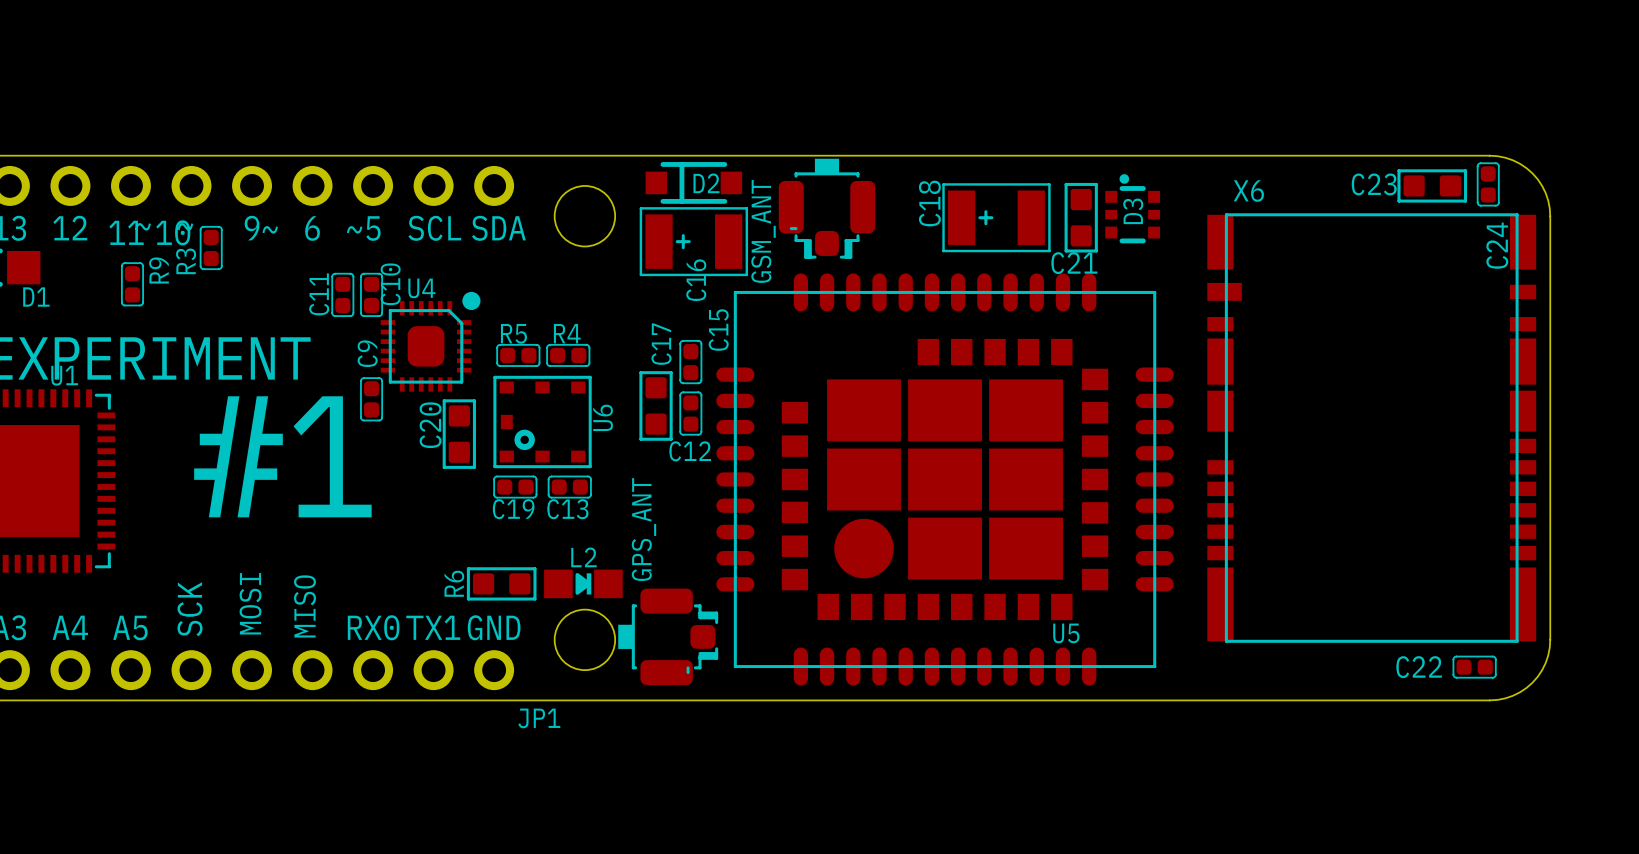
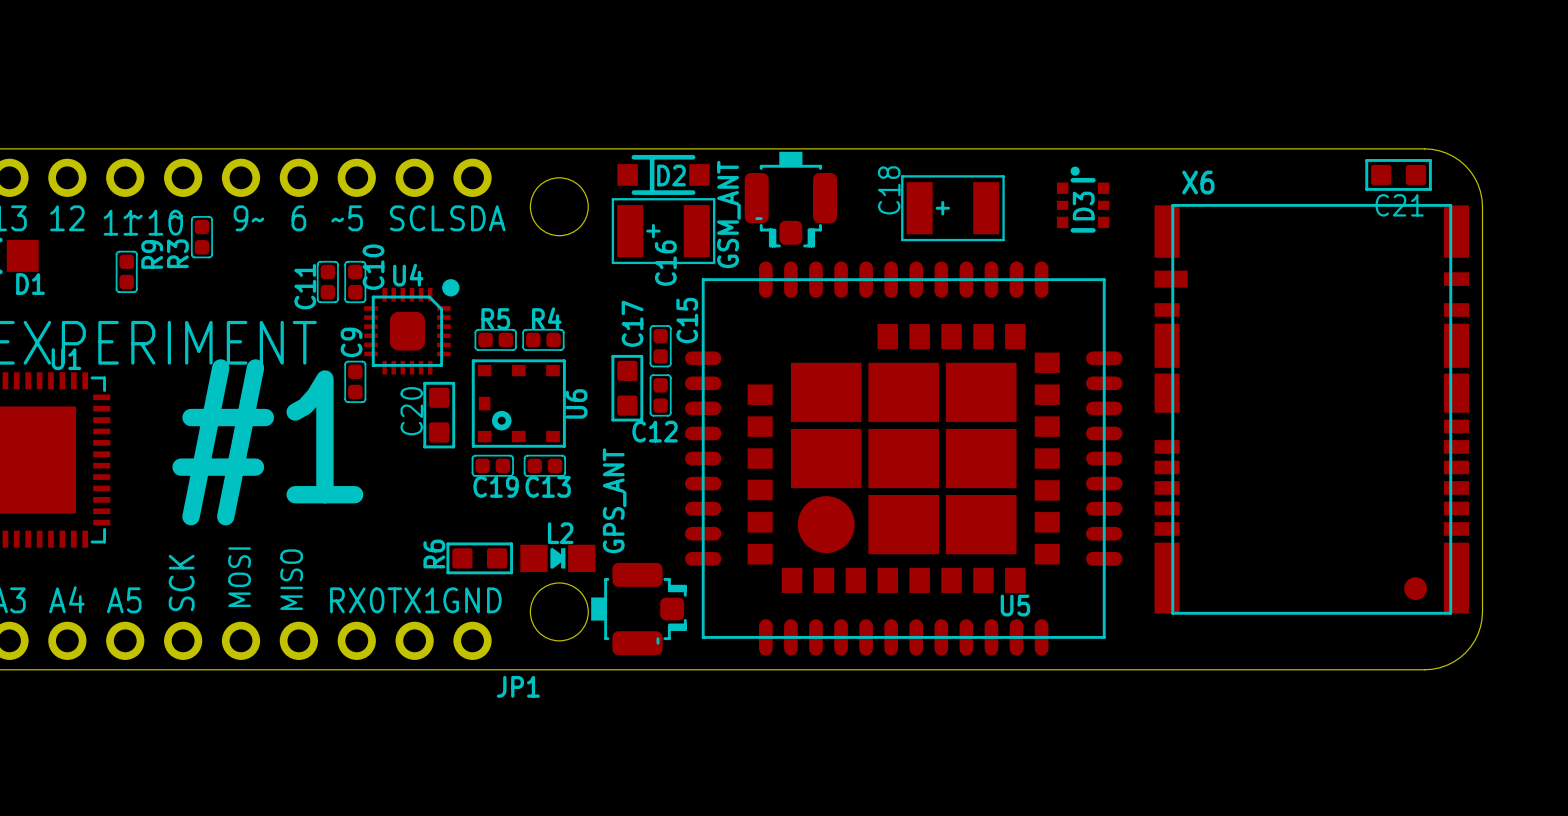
C24: (1488, 184) -> none
C23: (1432, 185) -> none
C21 rotation: 0° (1081, 217) -> 90° clockwise (1398, 174)
C21 position: (1081, 217) -> (1398, 174)
part: none -> (1415, 588)
C22: (1474, 667) -> none

